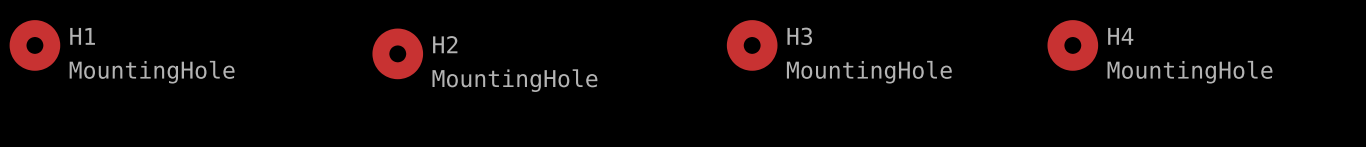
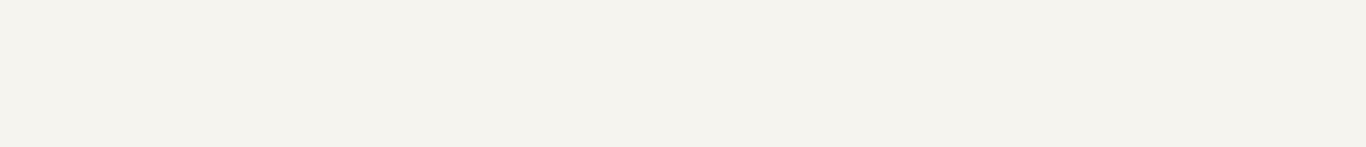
H1: MountingHole (34, 45) -> none
H3: MountingHole (752, 45) -> none
H4: MountingHole (1072, 45) -> none
H2: MountingHole (397, 53) -> none

